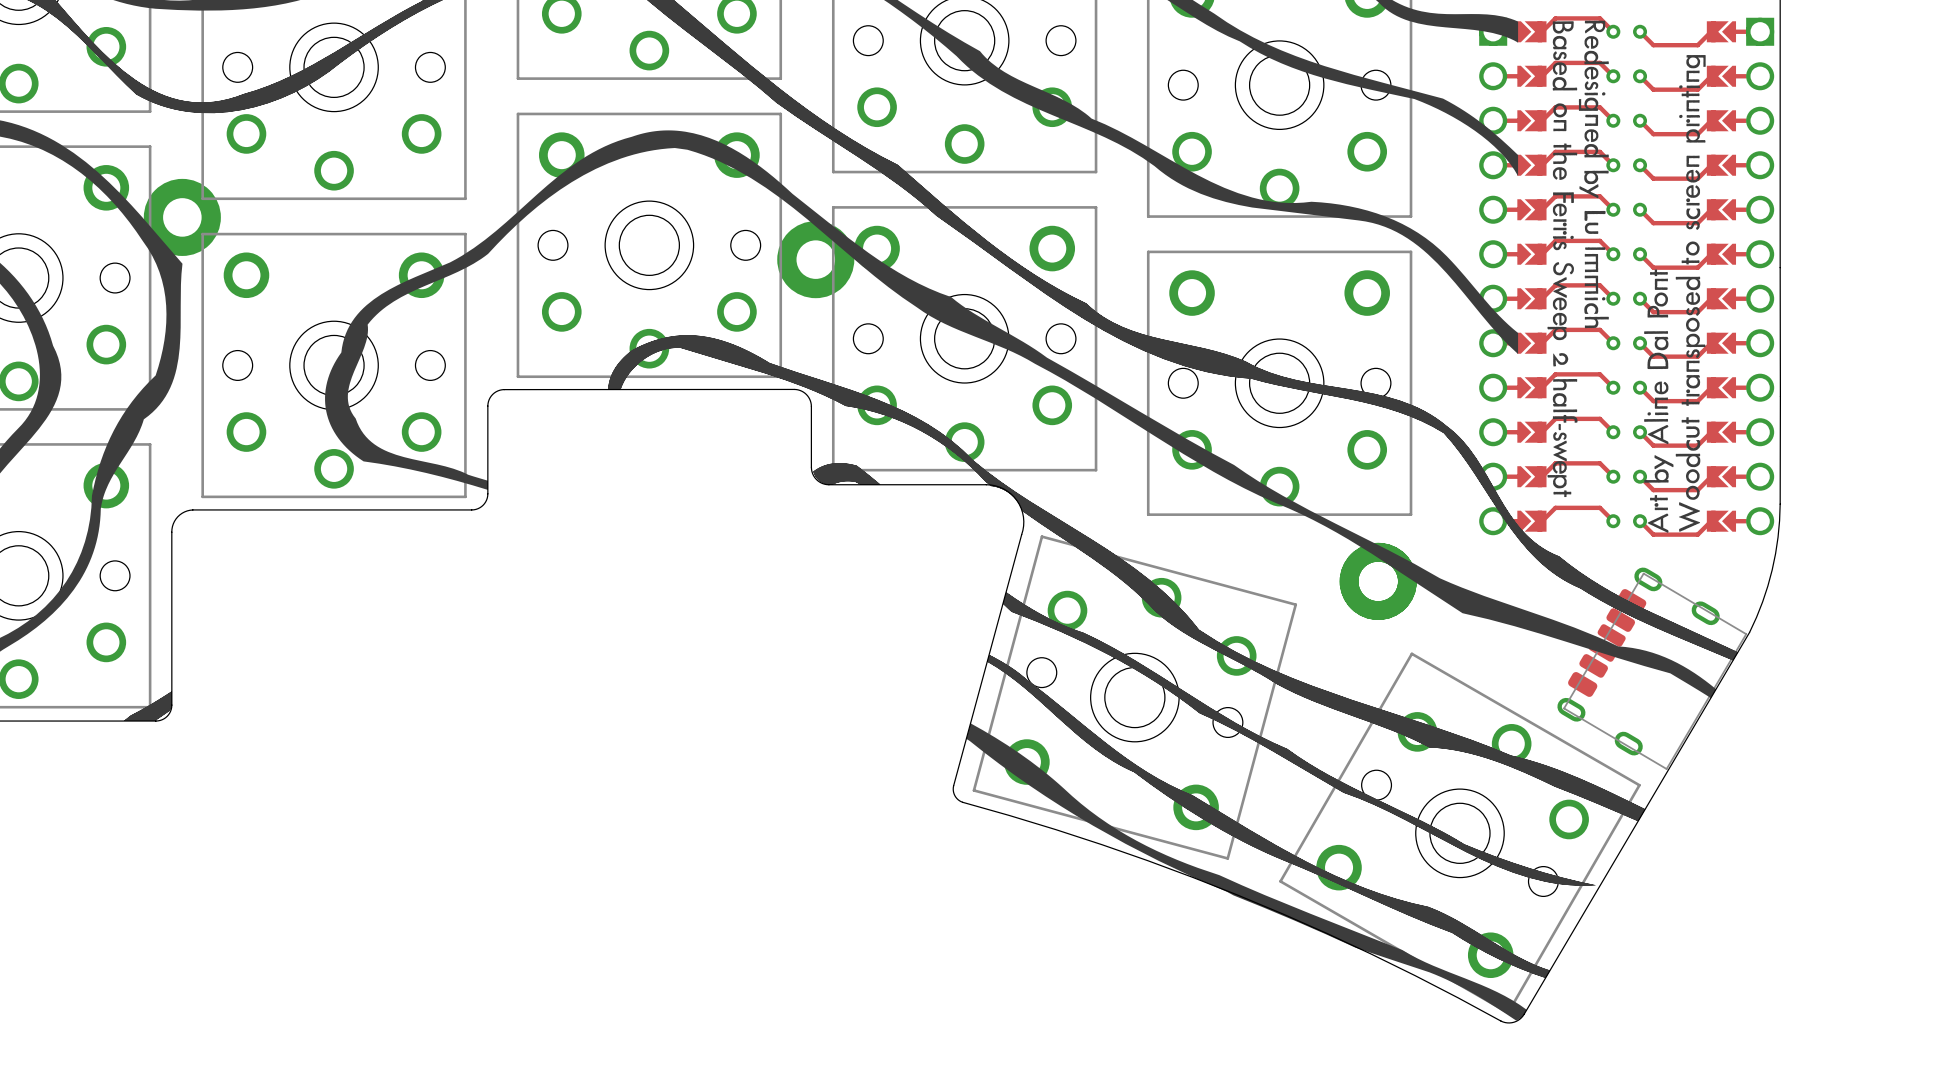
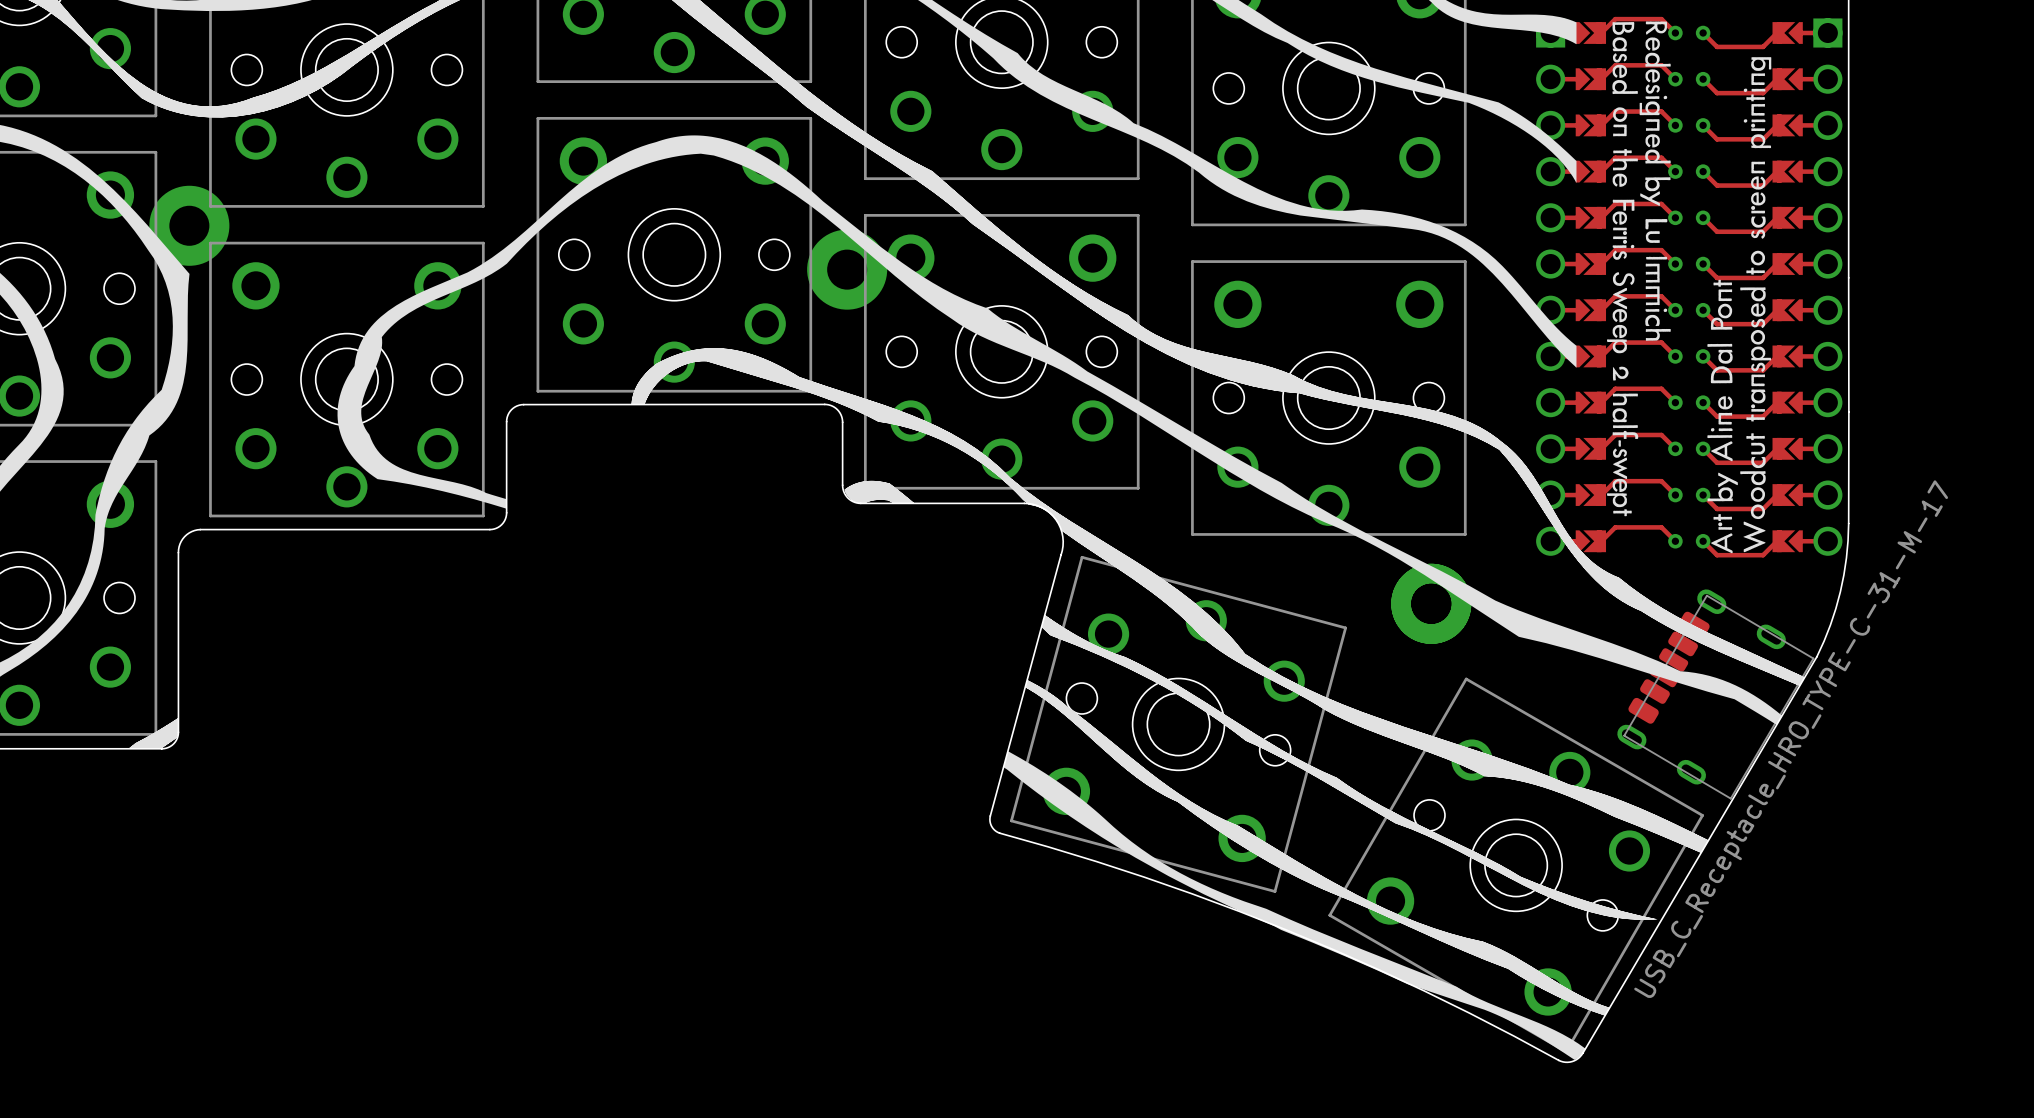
part value: none -> USB_C_Receptacle_HRO_TYPE-C-31-M-17 (1791, 739)

